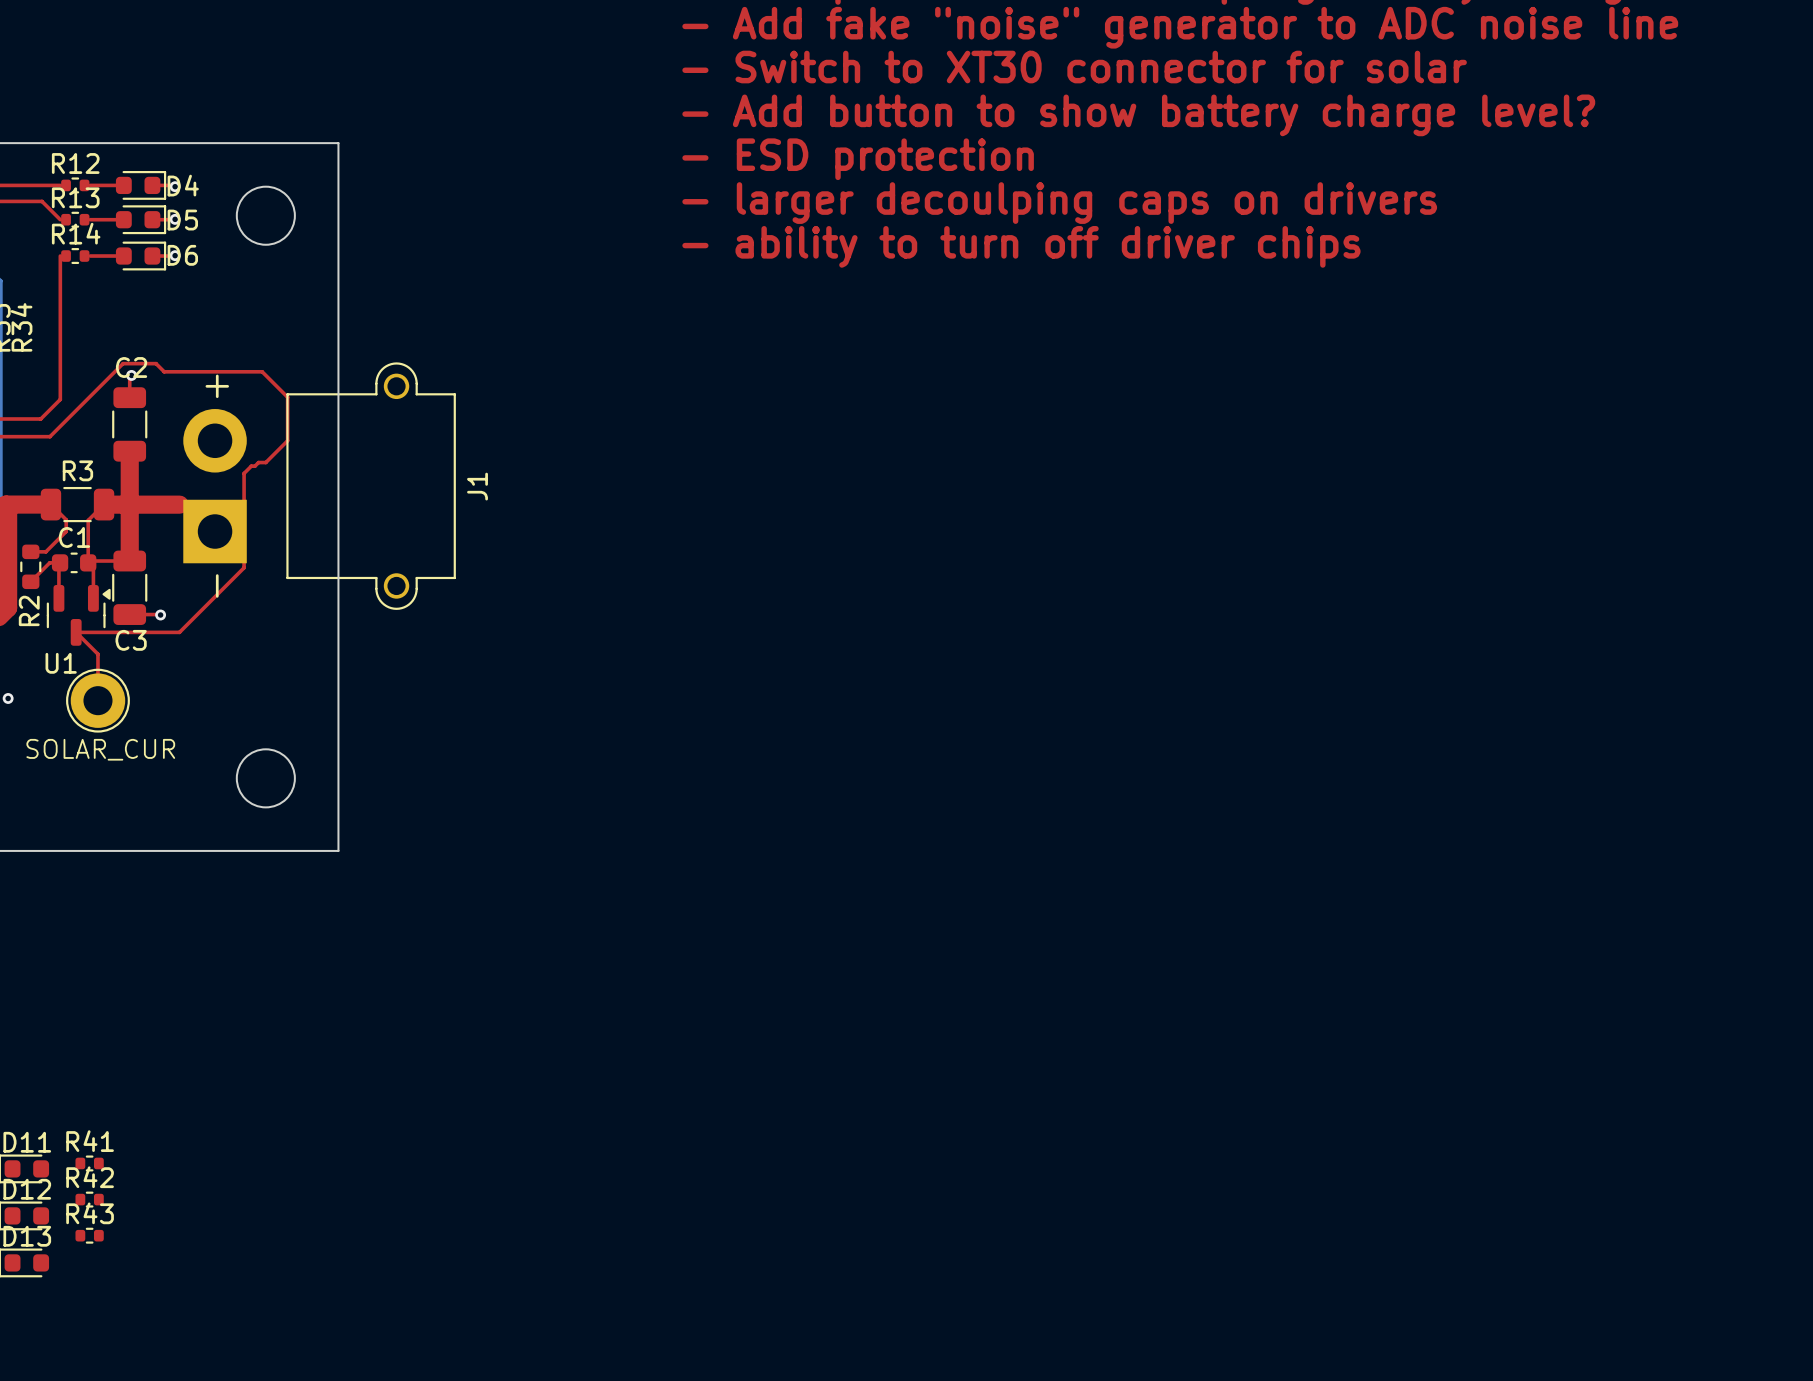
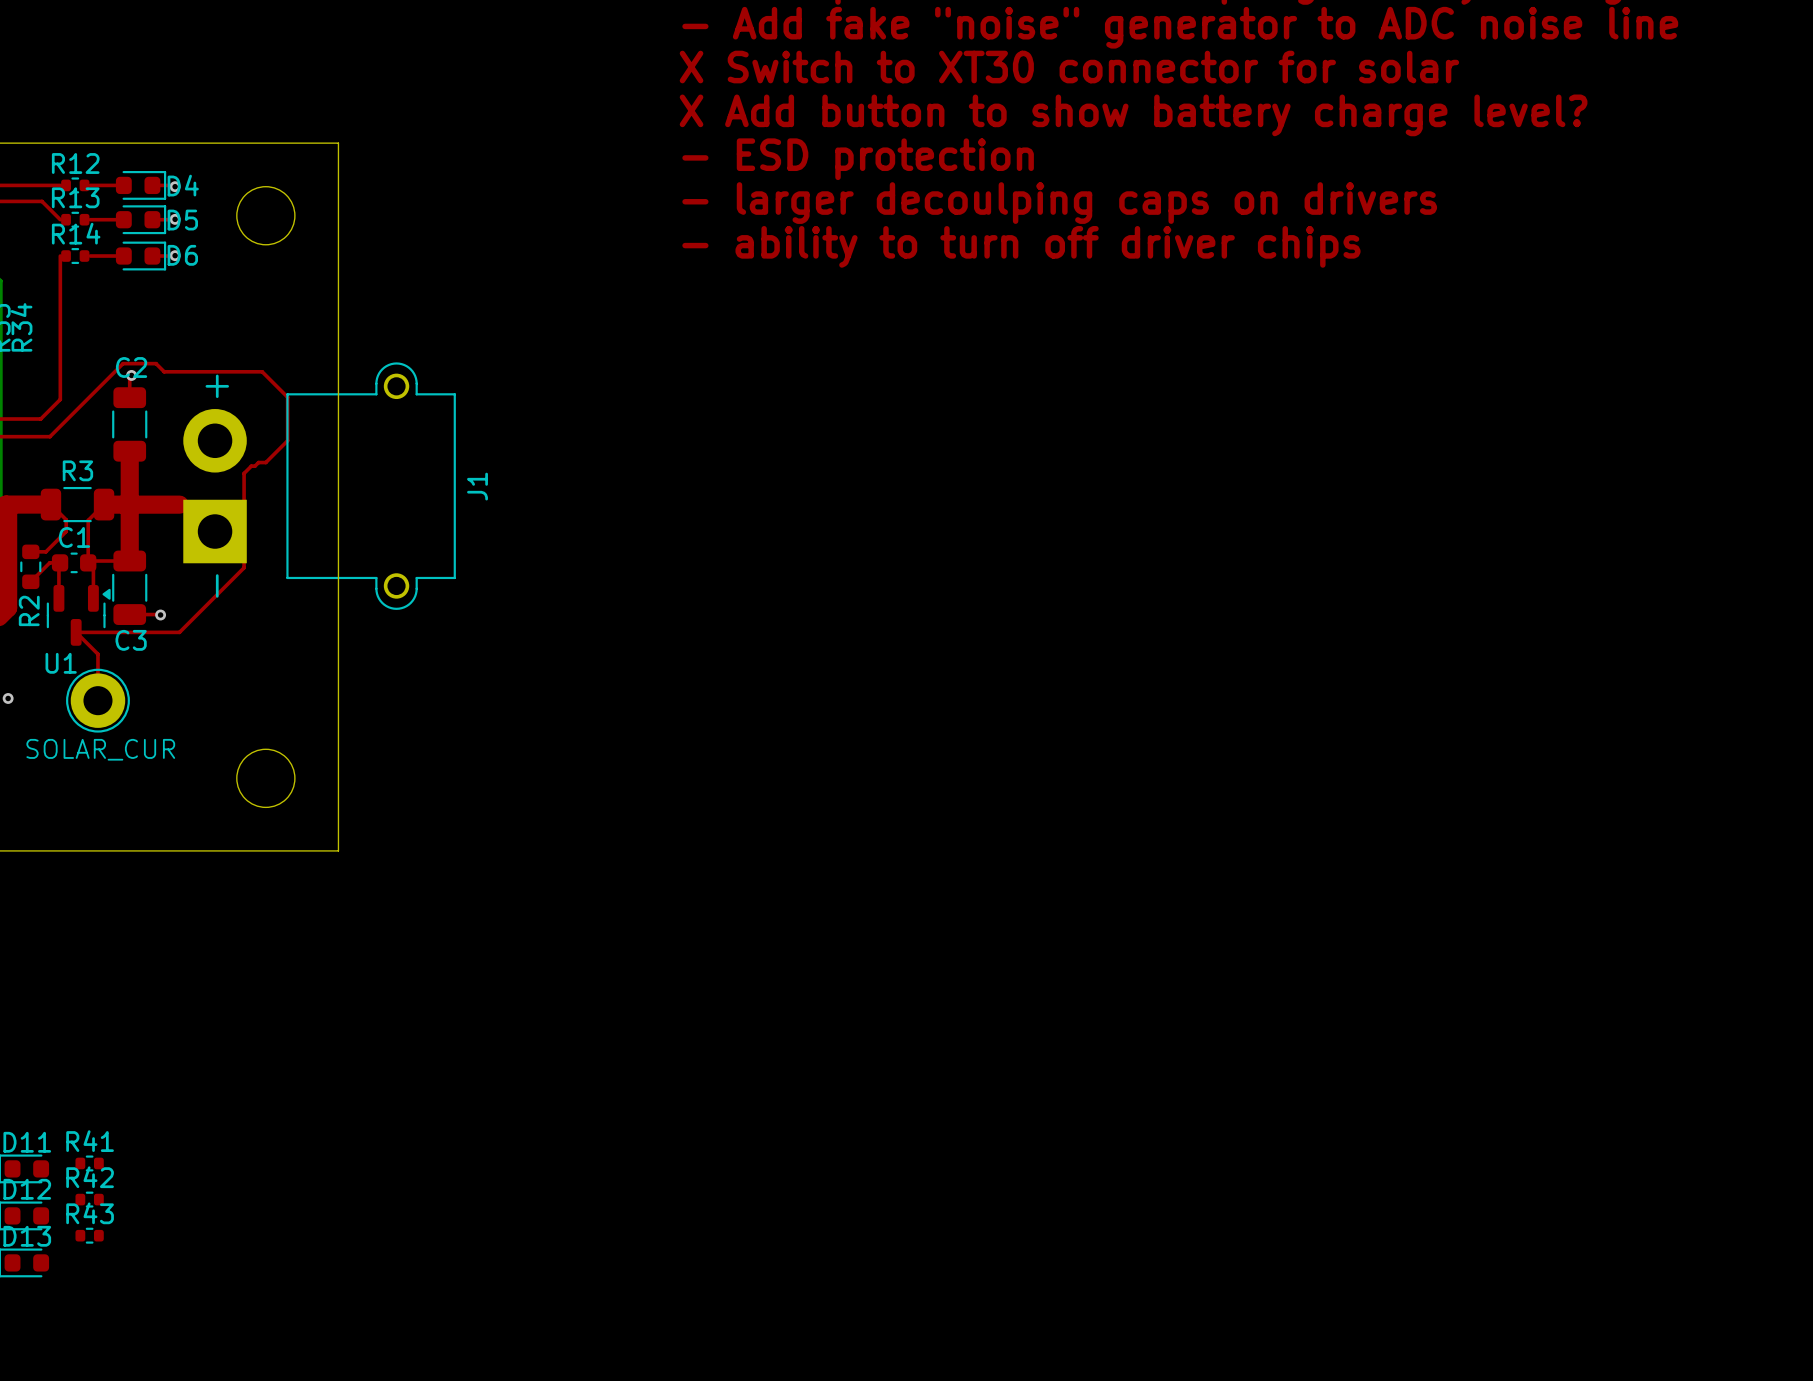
text: - Switch to XT30 connector for solar (1074, 67) -> X Switch to XT30 connector for solar (1069, 67)
text: - Add button to show battery charge level? (1138, 115) -> X Add button to show battery charge level? (1133, 115)

